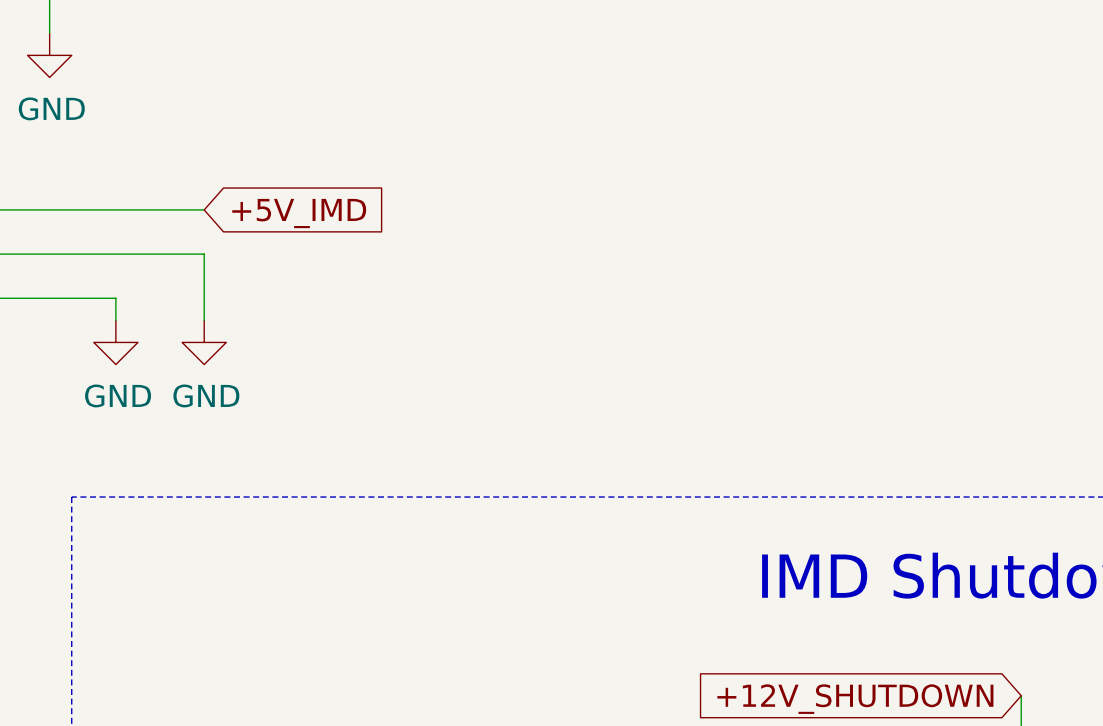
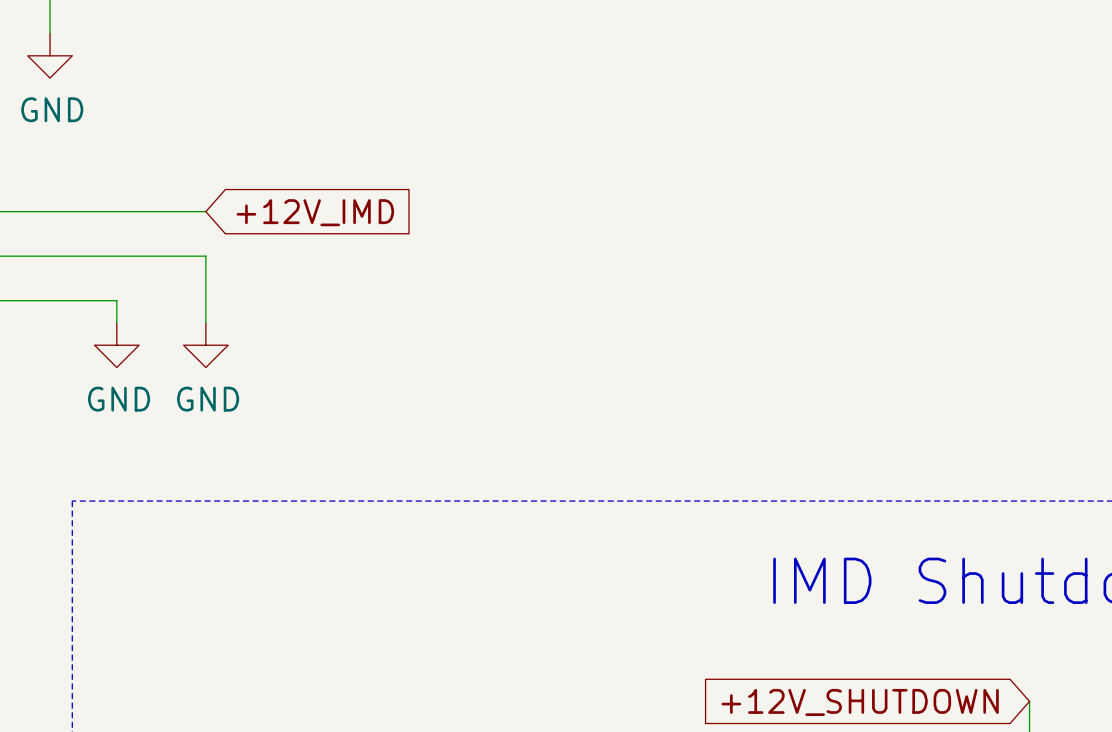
global label: +5V_IMD (299, 213) -> +12V_IMD (315, 212)

